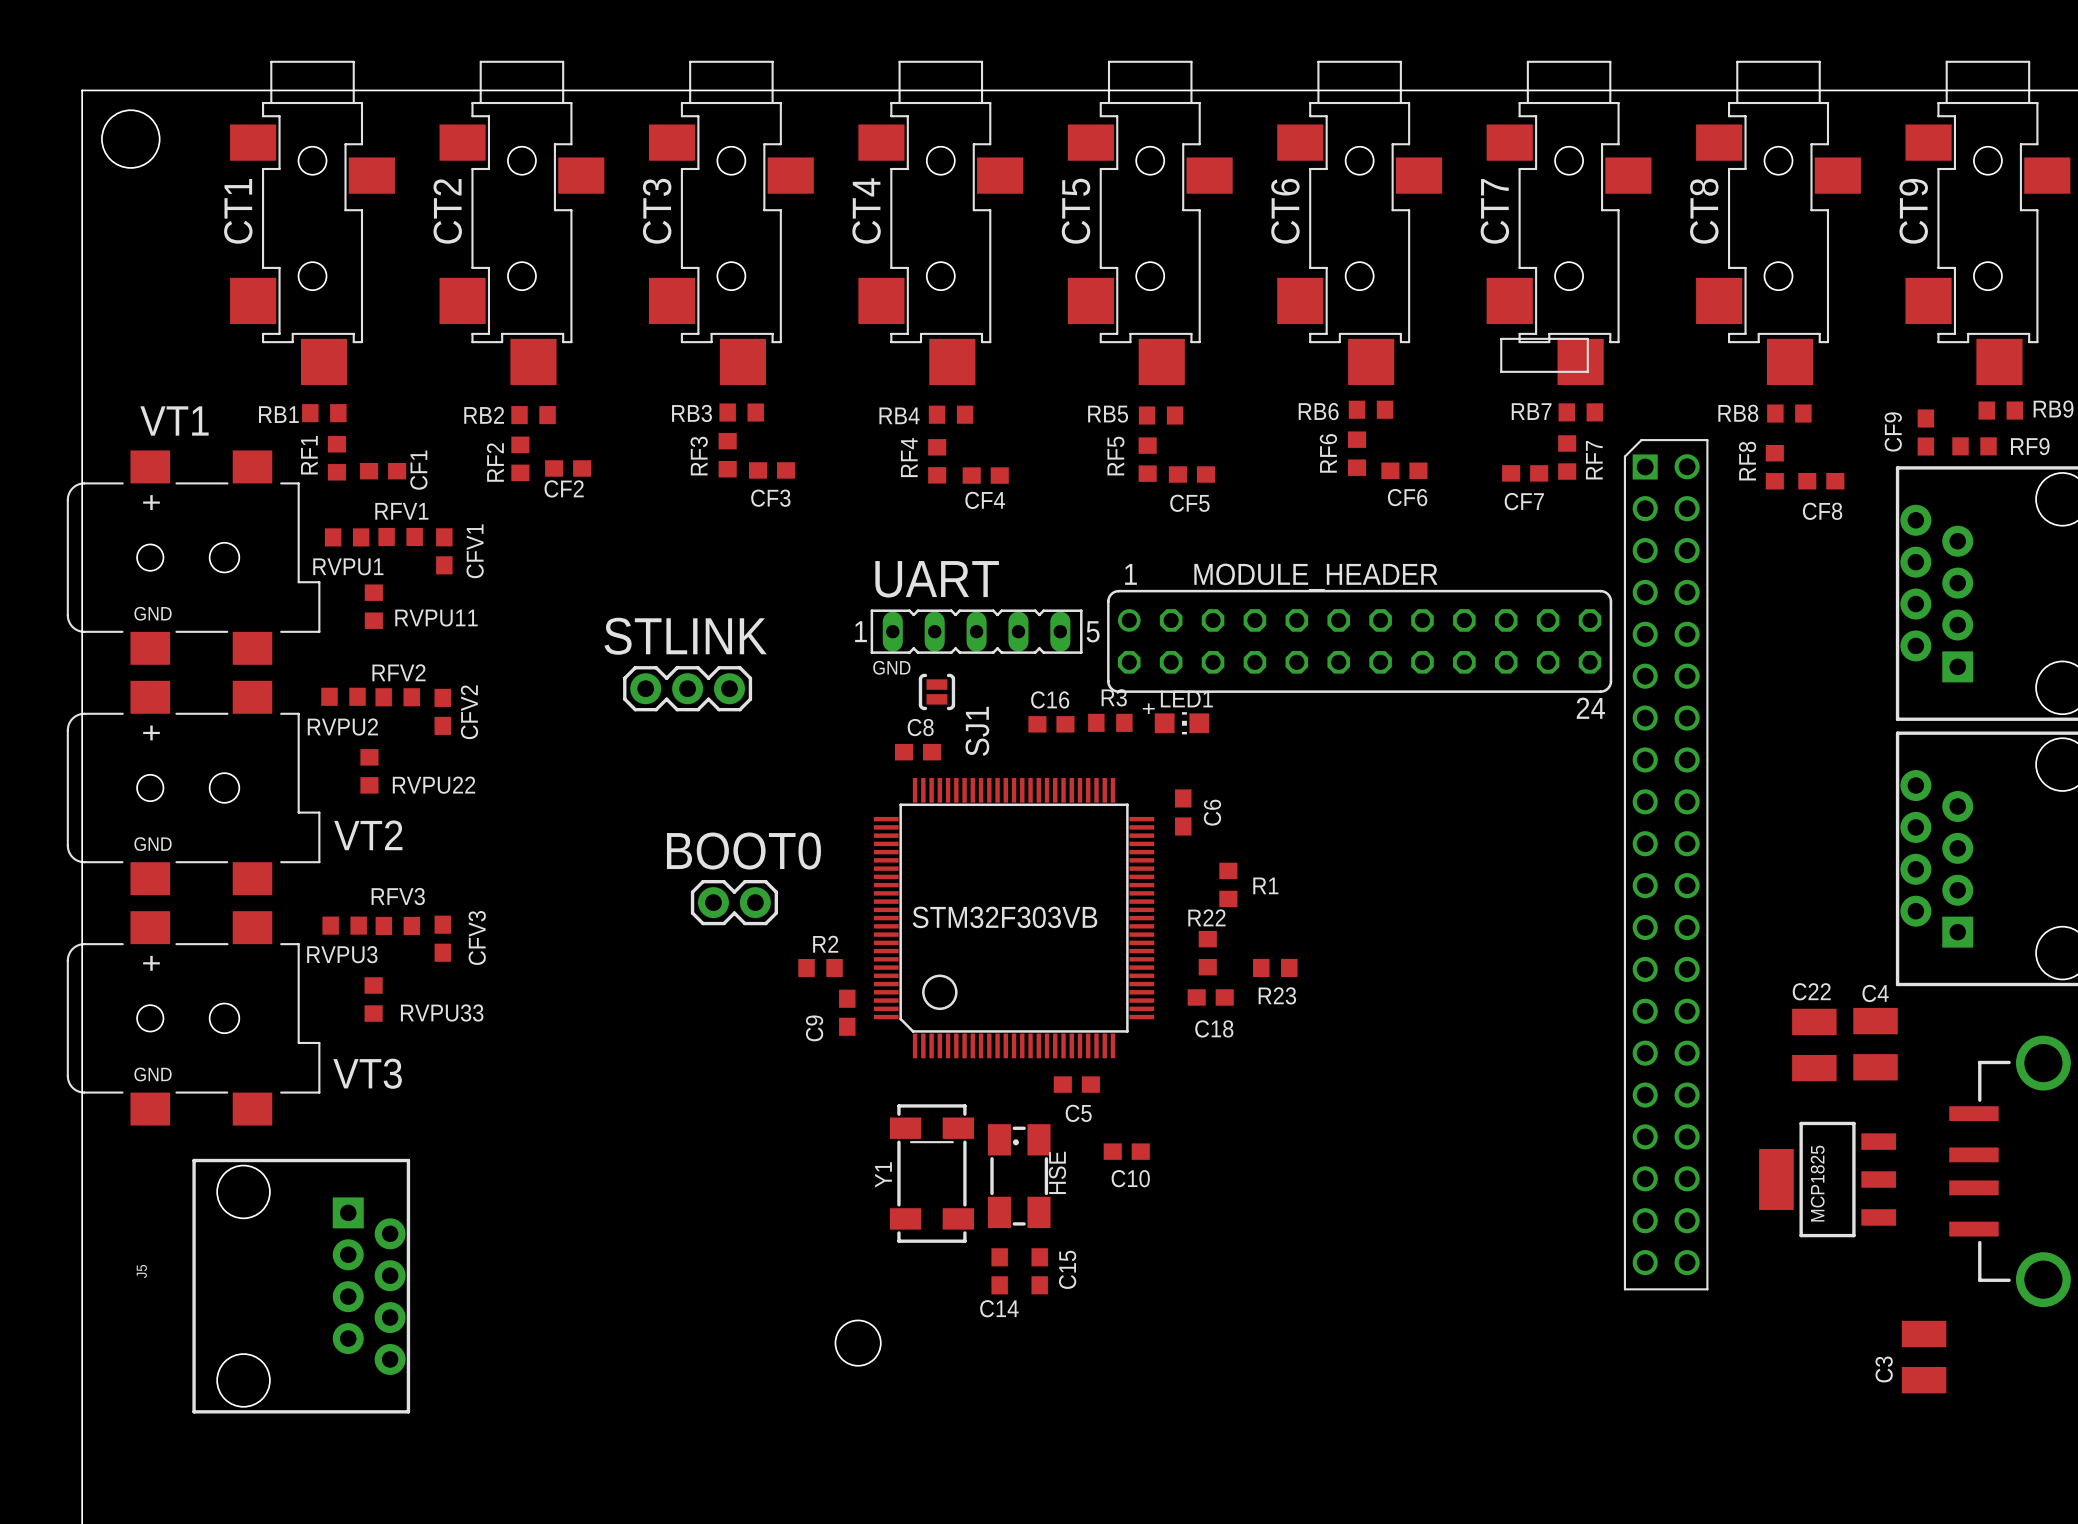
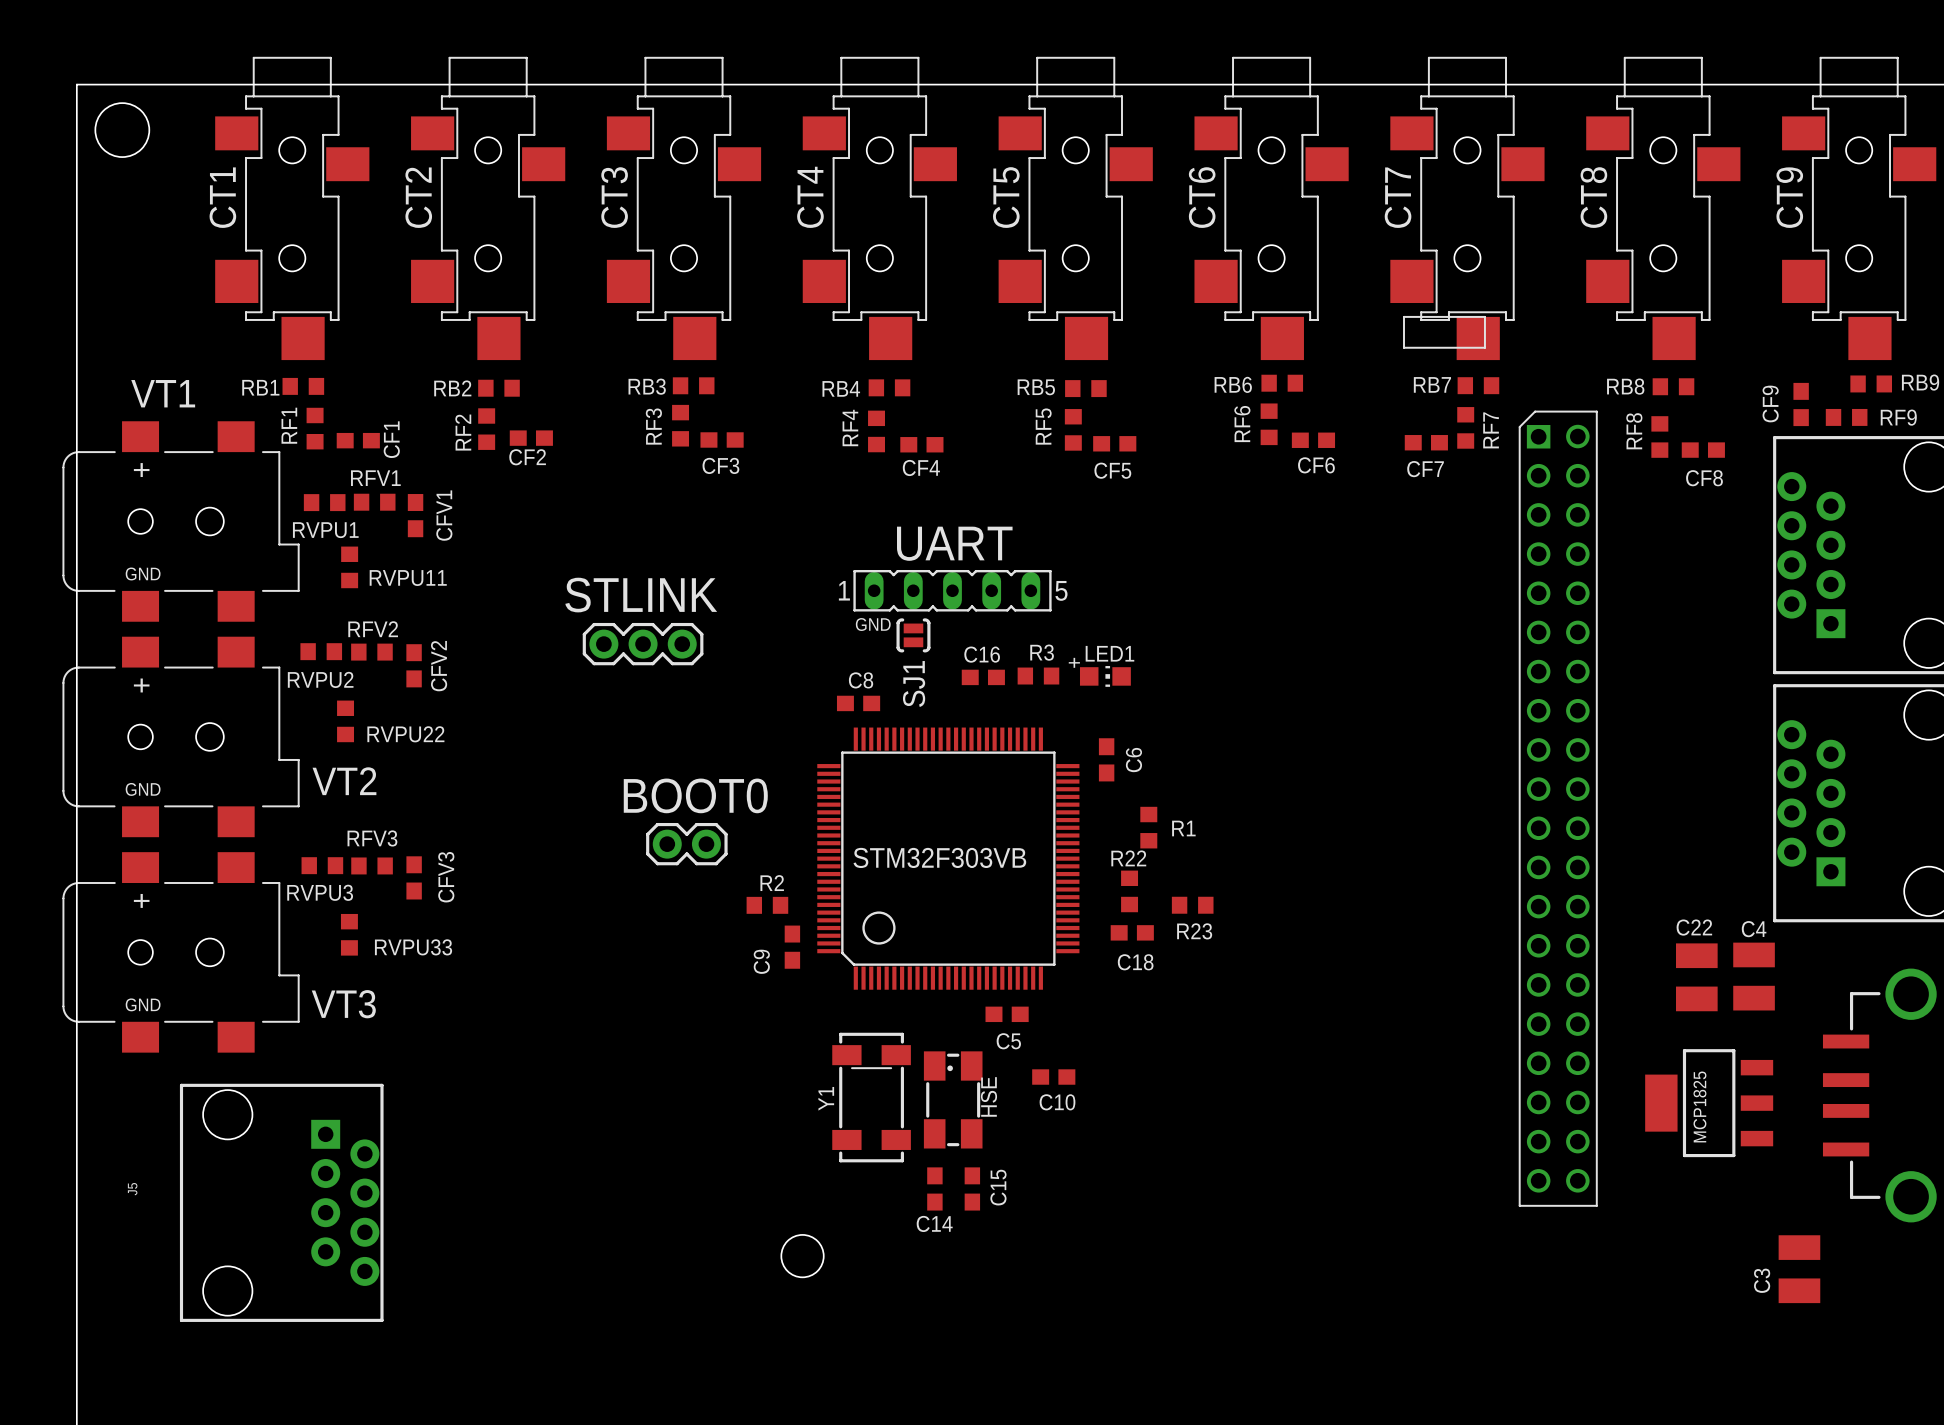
text position: UART (937, 579) -> UART (954, 543)
GND position: (976, 631) -> (952, 590)
MODULE_HEADER: (1359, 641) -> none
part position: (936, 691) -> (913, 635)

